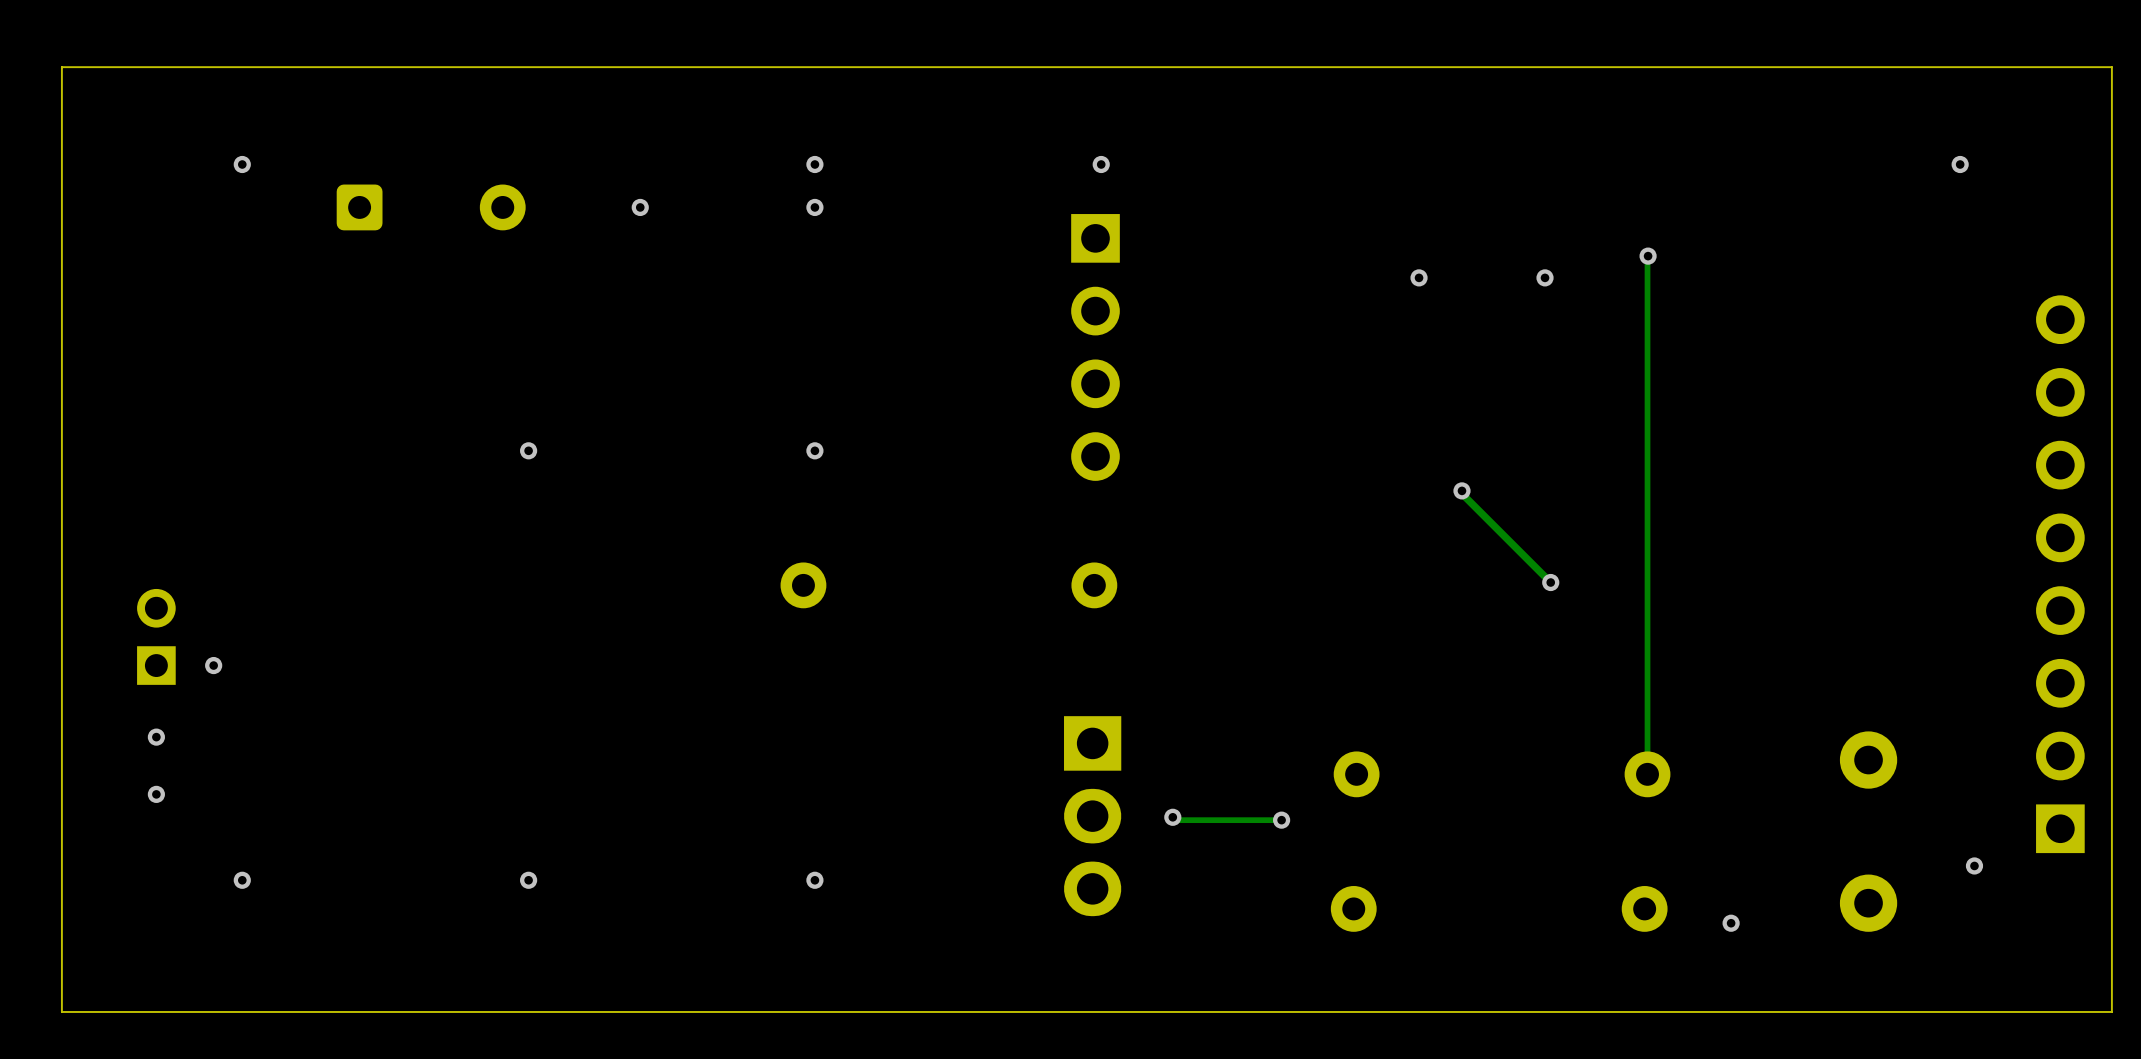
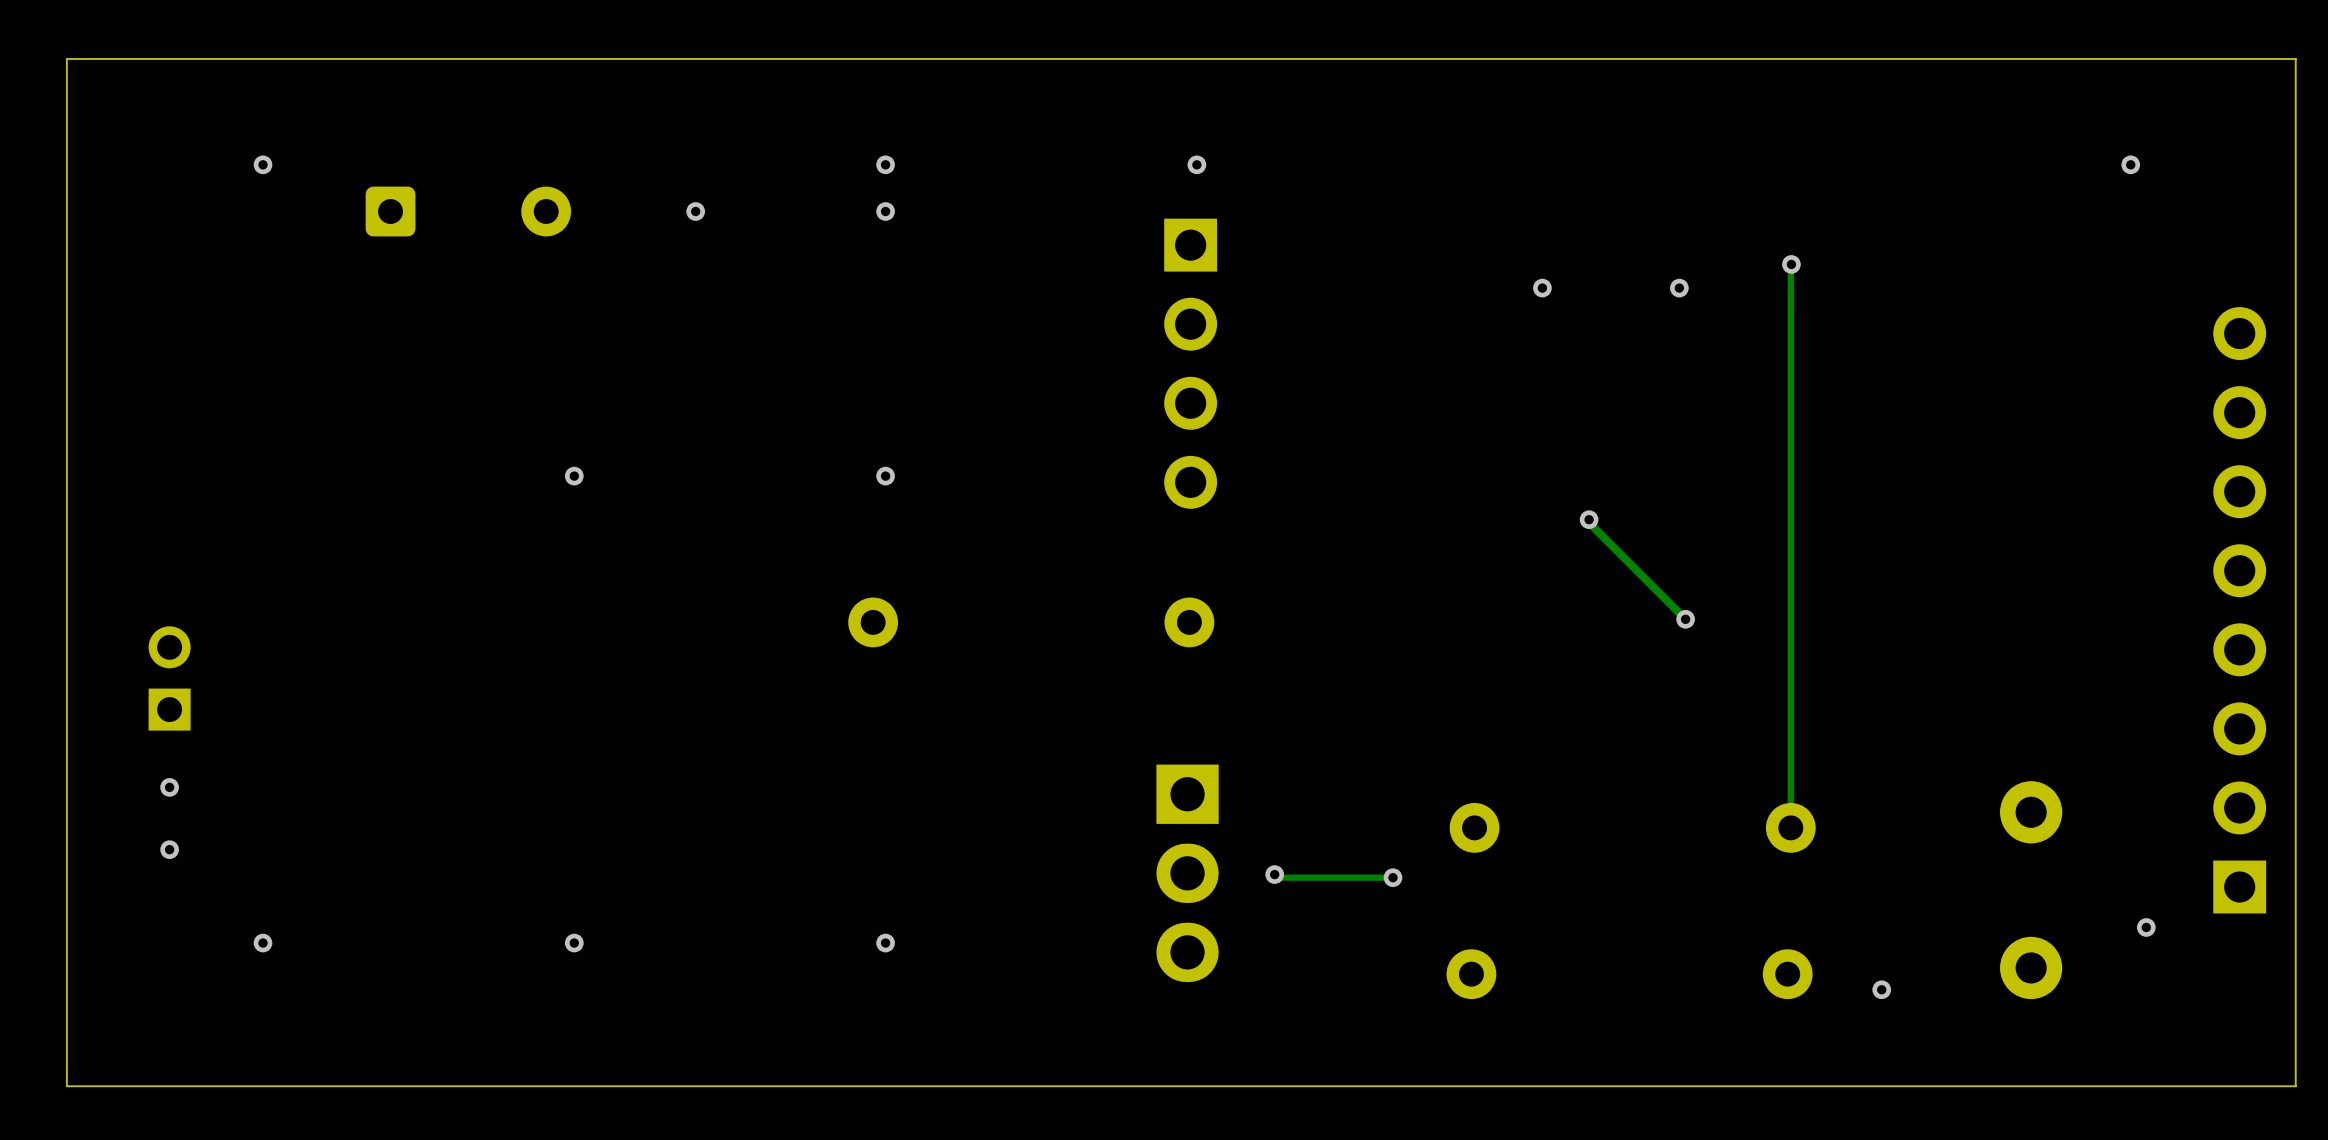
via: (213, 665) -> none

